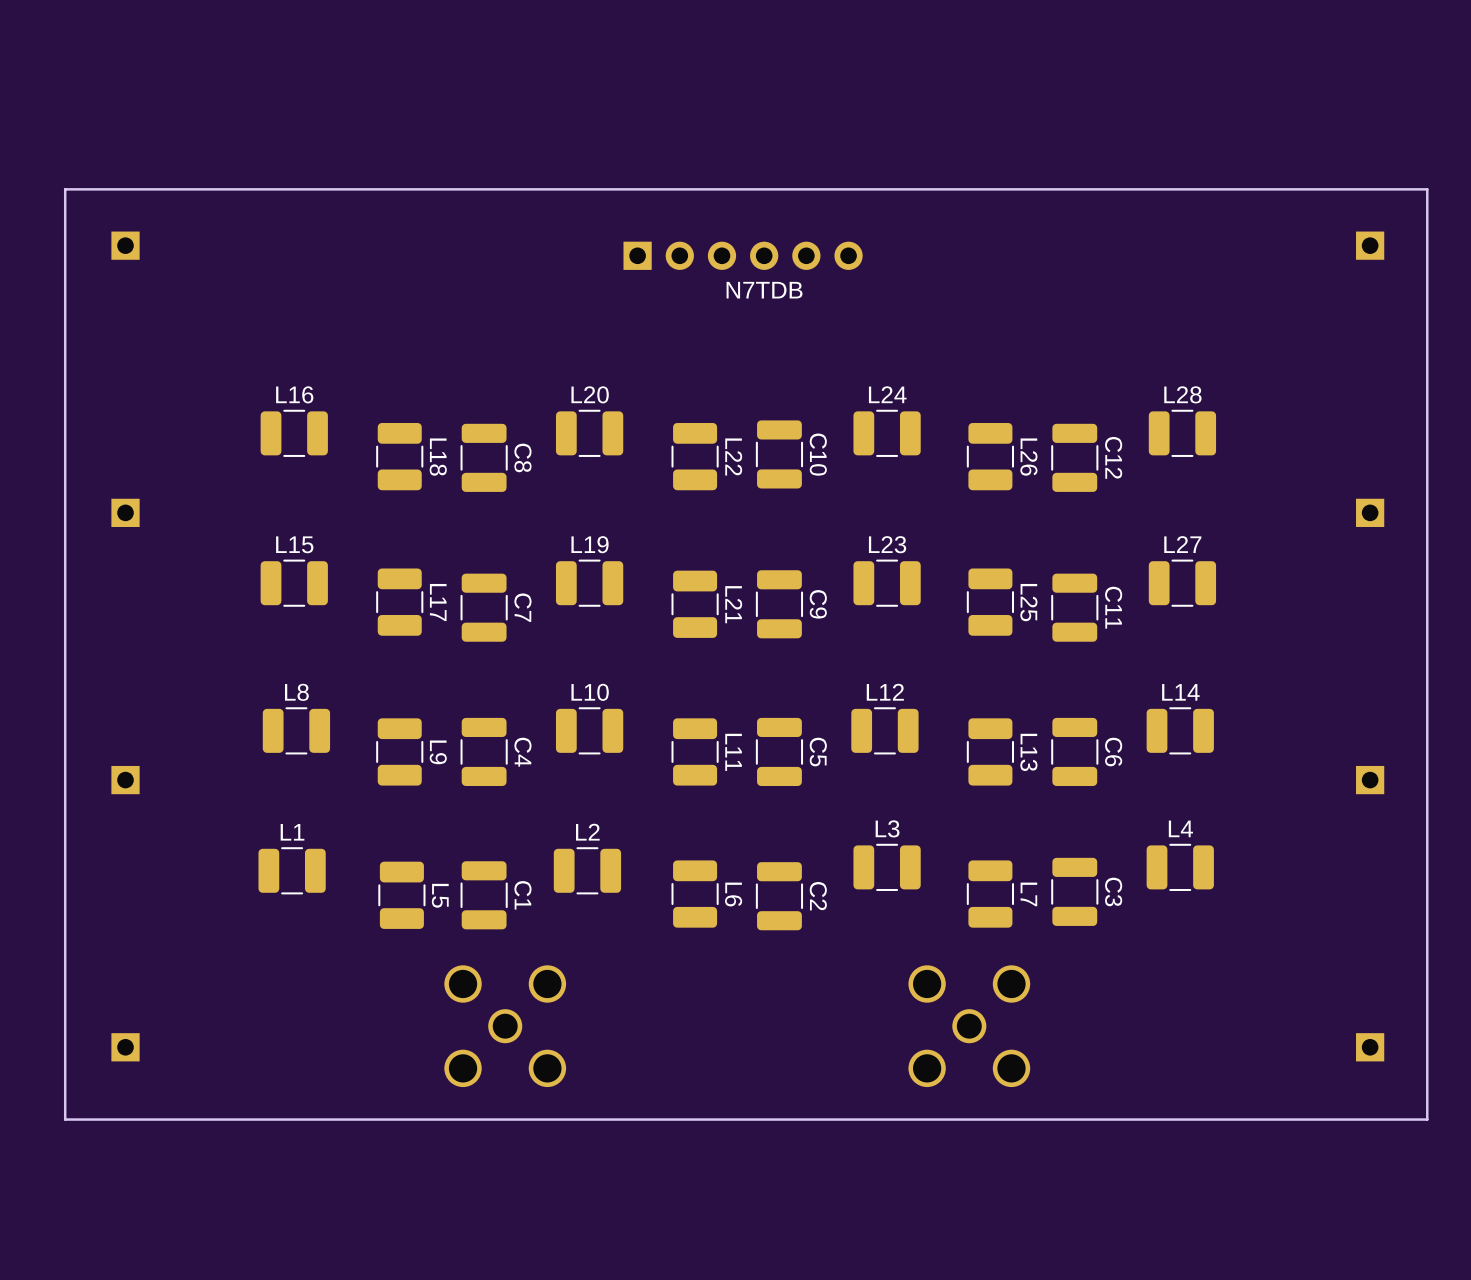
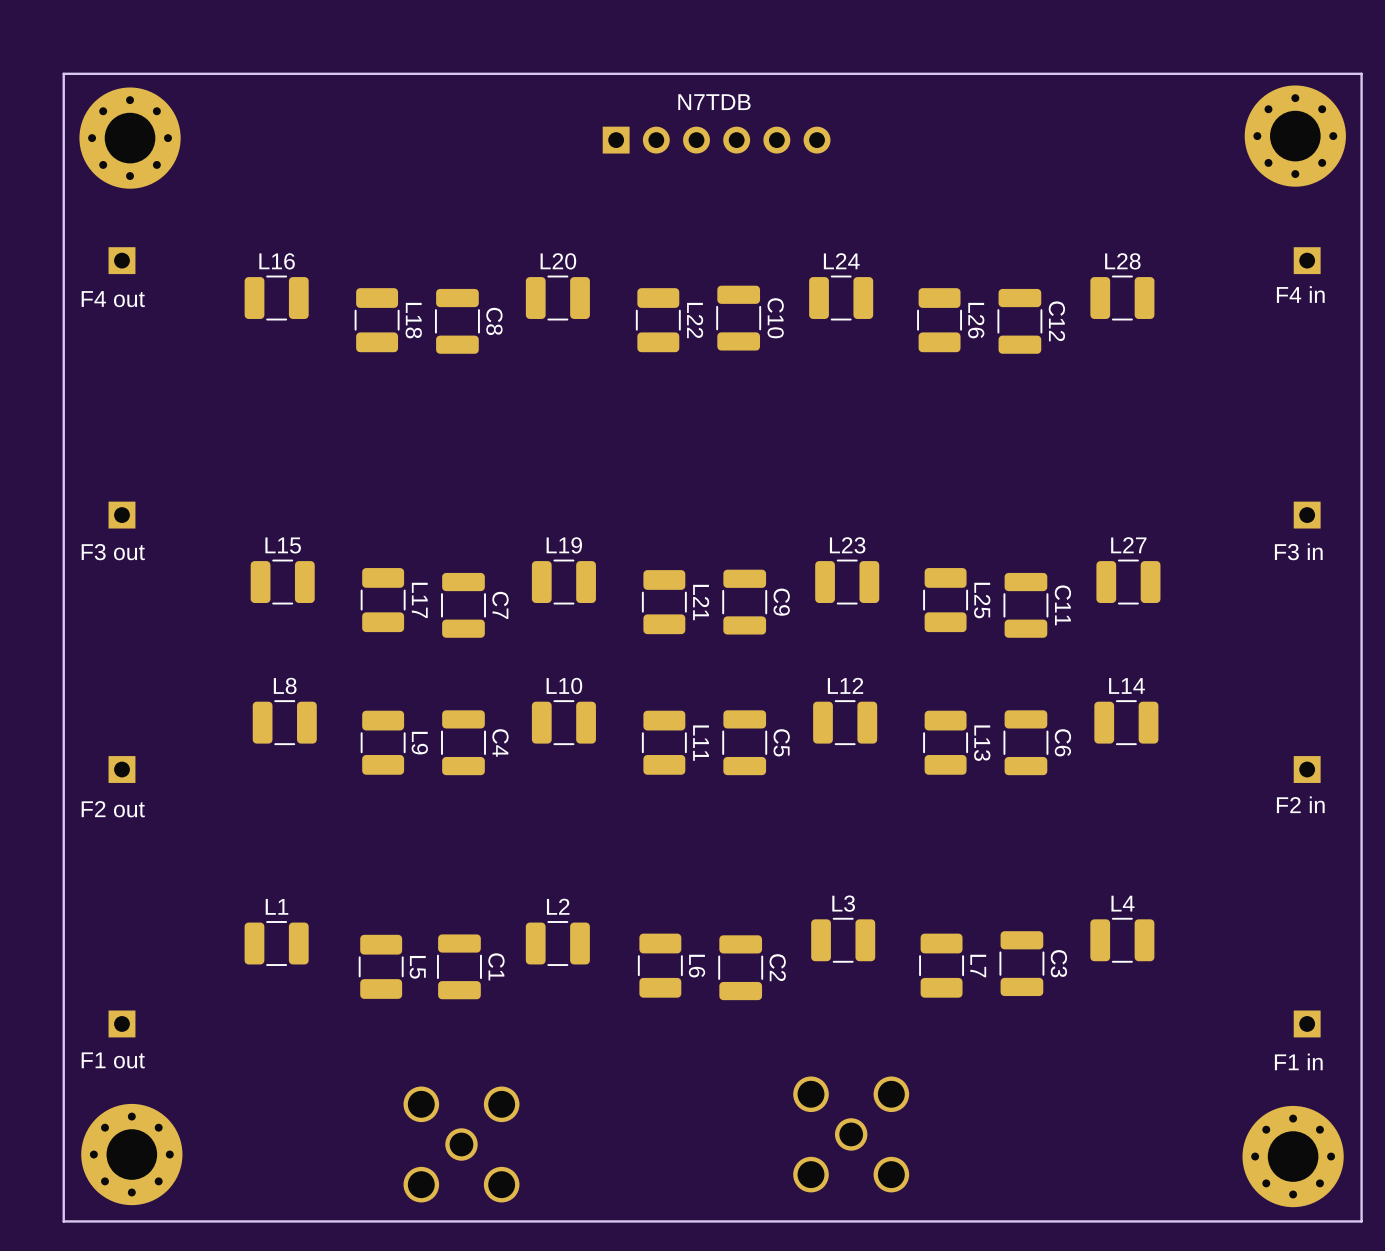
part: none -> (1295, 136)
part: none -> (130, 138)
board edge: (1427, 189) (65, 189) (65, 1119) (1427, 1119) -> (1361, 207) (1361, 73) (63, 73) (63, 1221) (1361, 1221) (1361, 1092)
part position: (743, 255) -> (716, 140)
text: none -> F4 in (1300, 294)
text: none -> F4 out (113, 299)
text position: N7TDB (764, 290) -> N7TDB (714, 102)
L16 position: (294, 433) -> (276, 298)
L20 position: (589, 433) -> (557, 298)
L24 position: (887, 433) -> (841, 298)
L28 position: (1182, 433) -> (1122, 298)
C10 position: (779, 454) -> (738, 318)
L18 position: (399, 456) -> (377, 320)
L22 position: (695, 456) -> (658, 320)
L26 position: (990, 456) -> (939, 320)
C8 position: (484, 457) -> (457, 321)
C12 position: (1074, 457) -> (1019, 321)
text: none -> F3 out (113, 552)
text: none -> F3 in (1298, 551)
text: none -> F2 in (1300, 804)
text: none -> F2 out (113, 809)
L3 position: (887, 867) -> (843, 940)
L4 position: (1180, 867) -> (1122, 940)
L1 position: (292, 870) -> (276, 943)
L2 position: (587, 870) -> (557, 943)
C3 position: (1074, 891) -> (1021, 963)
L6 position: (695, 894) -> (660, 965)
L7 position: (990, 894) -> (941, 965)
L5 position: (401, 895) -> (381, 966)
C1 position: (484, 895) -> (459, 966)
C2 position: (779, 896) -> (740, 967)
part position: (505, 1026) -> (461, 1144)
part position: (969, 1026) -> (851, 1134)
text: none -> F1 out (113, 1060)
text: none -> F1 in (1298, 1061)
part: none -> (131, 1154)
part: none -> (1293, 1156)

